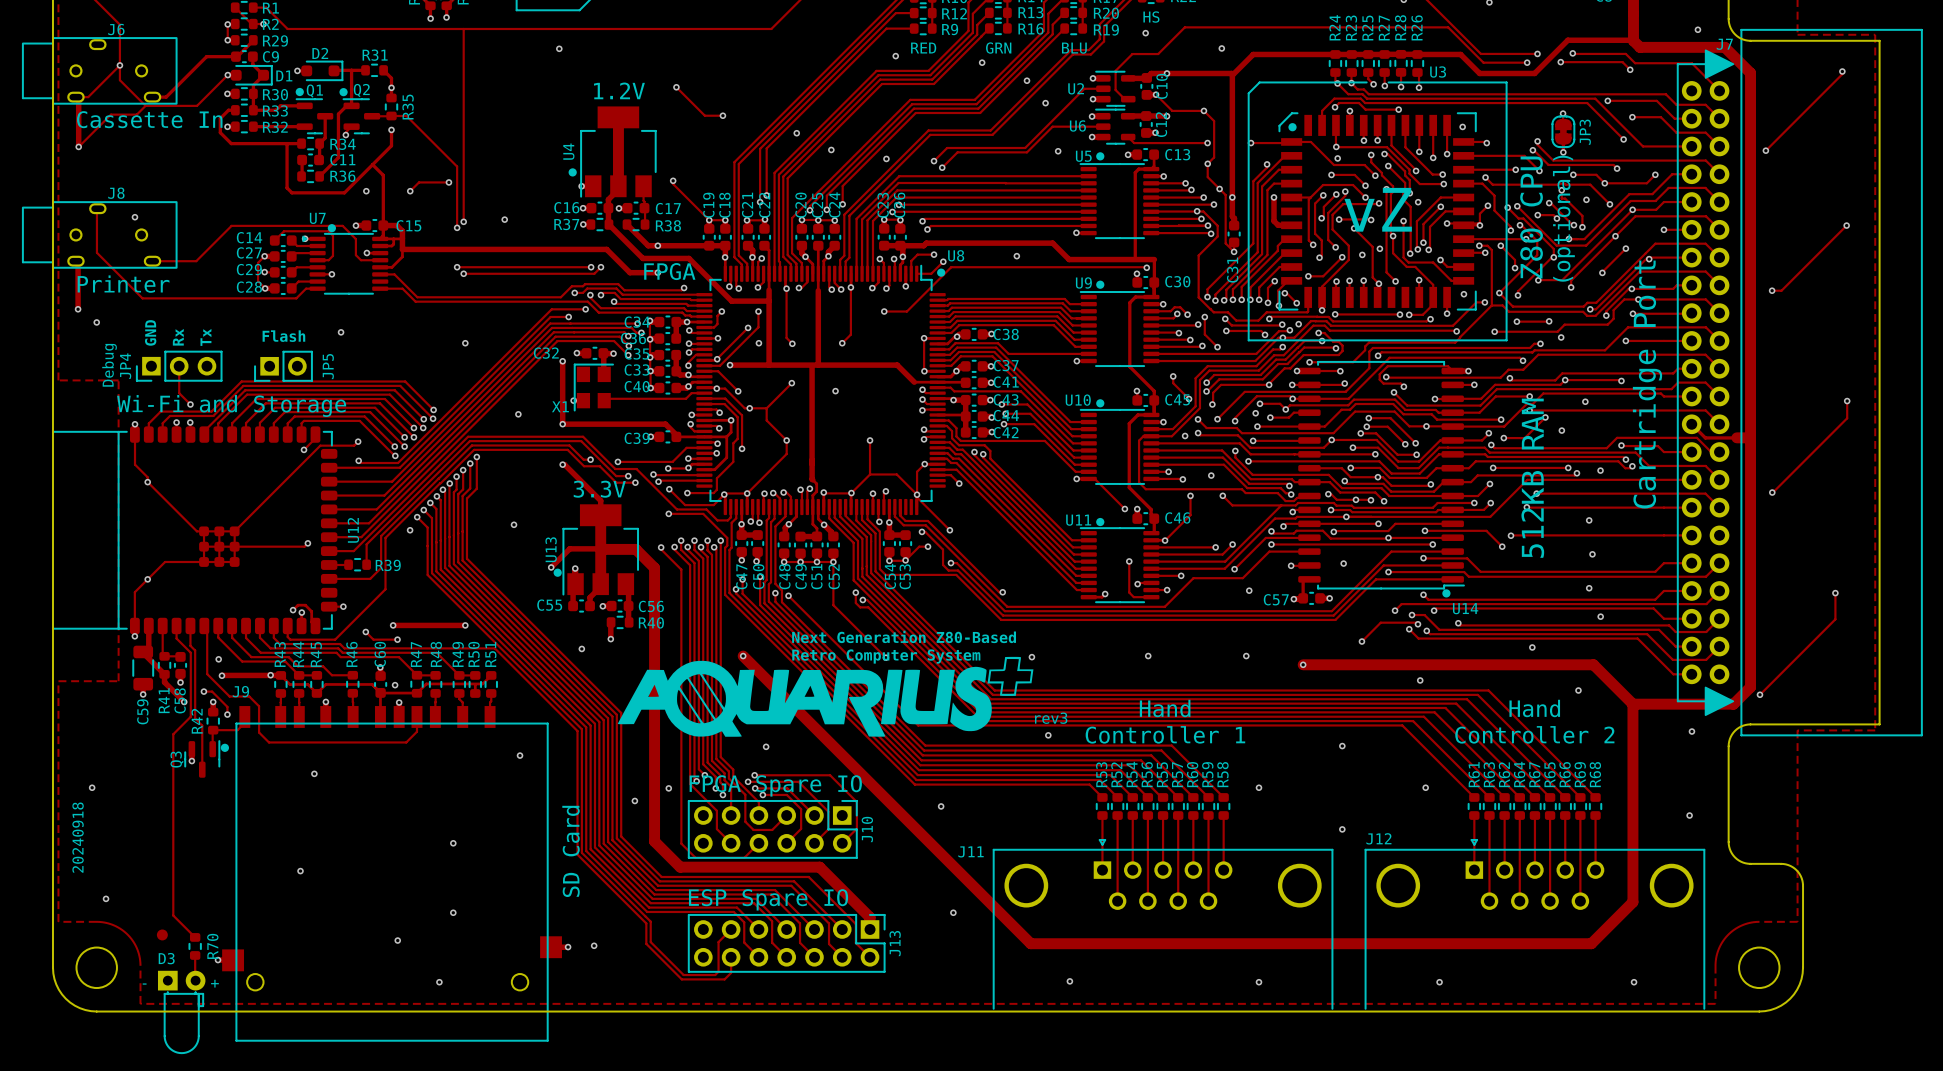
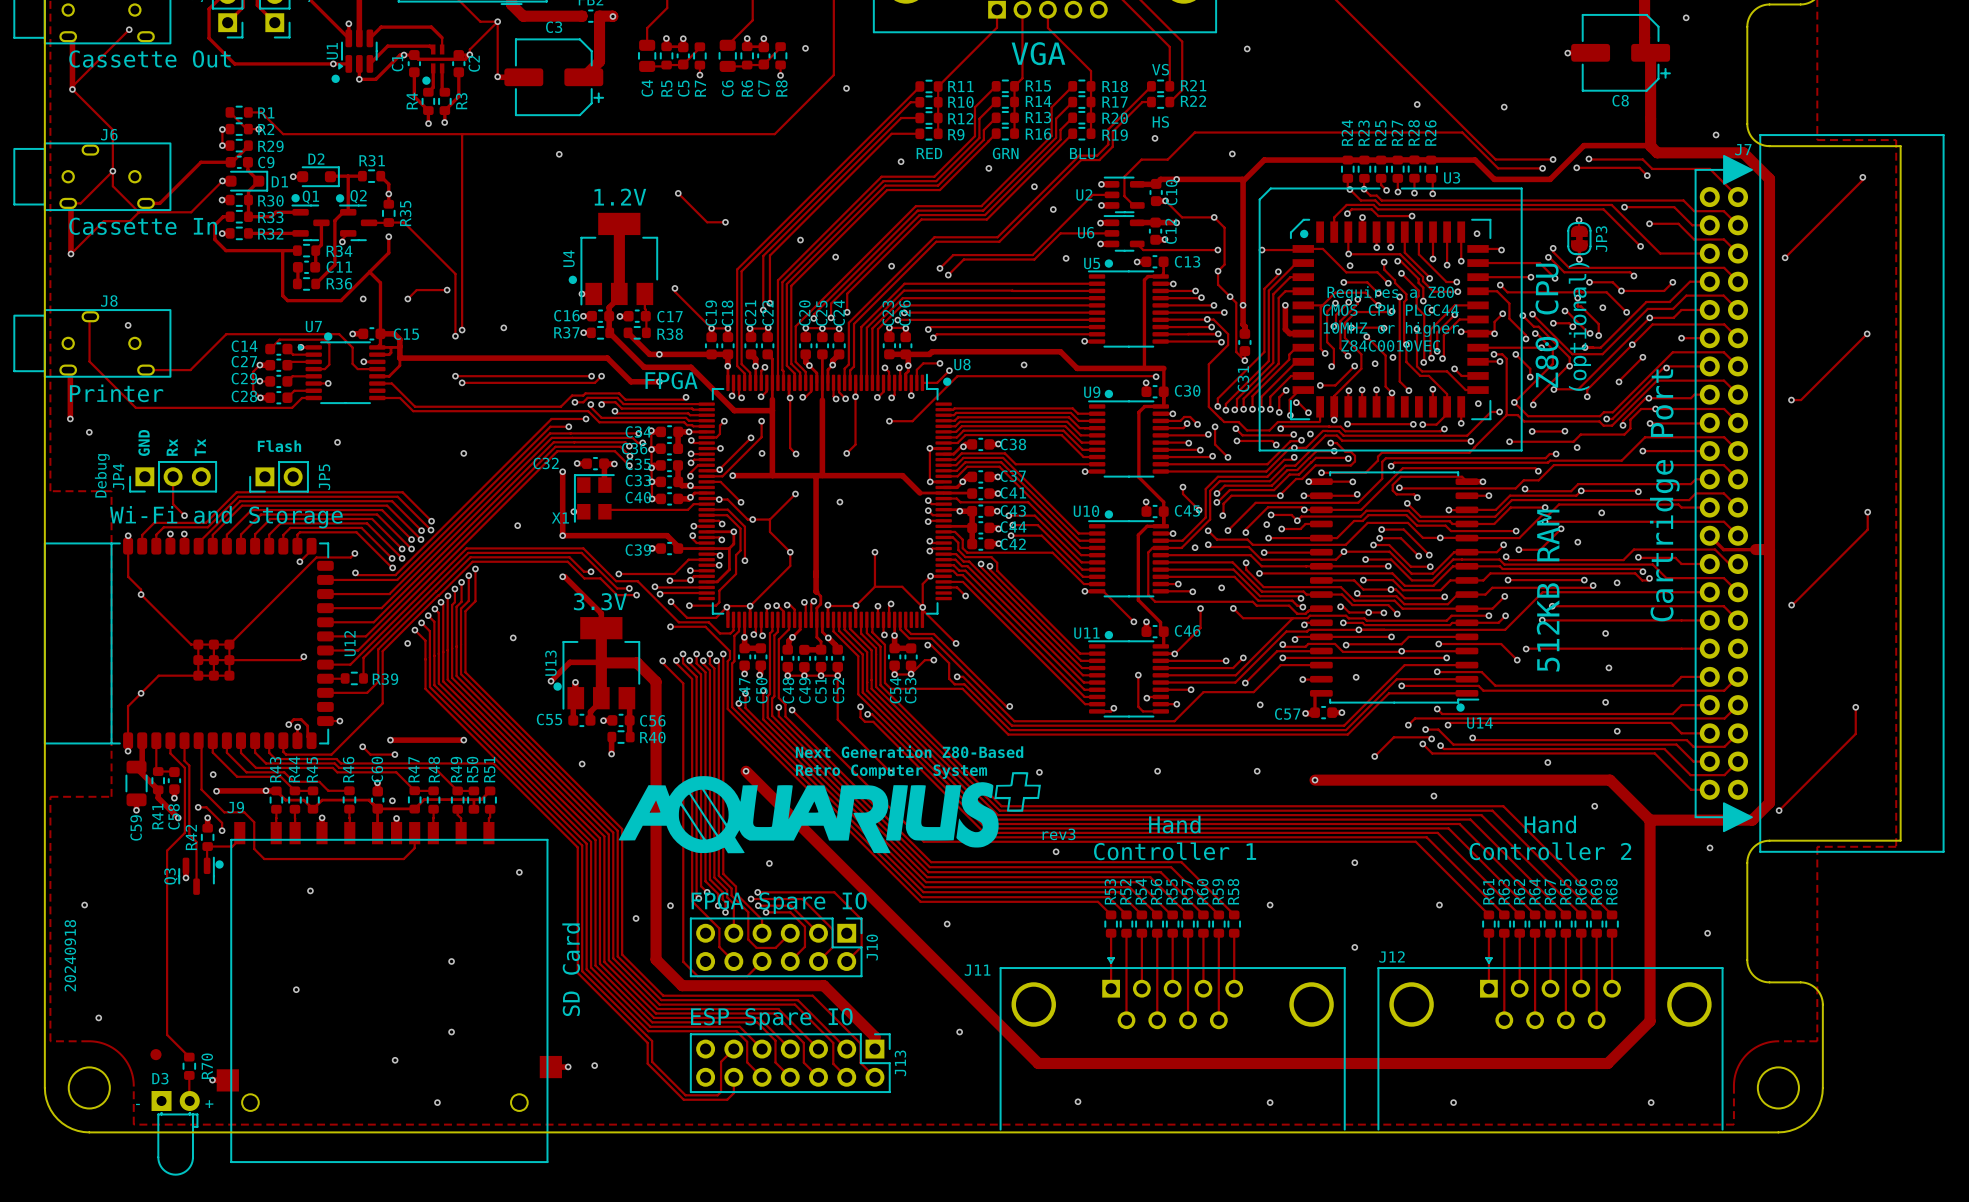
text: none -> Requires a Z80 (1390, 293)
text: none -> CMOS CPU PLCC44 (1390, 310)
text: vZ (1378, 209) -> none
text: none -> 10MHZ or higher (1391, 329)
text: none -> Z84C0010VEC (1390, 345)

